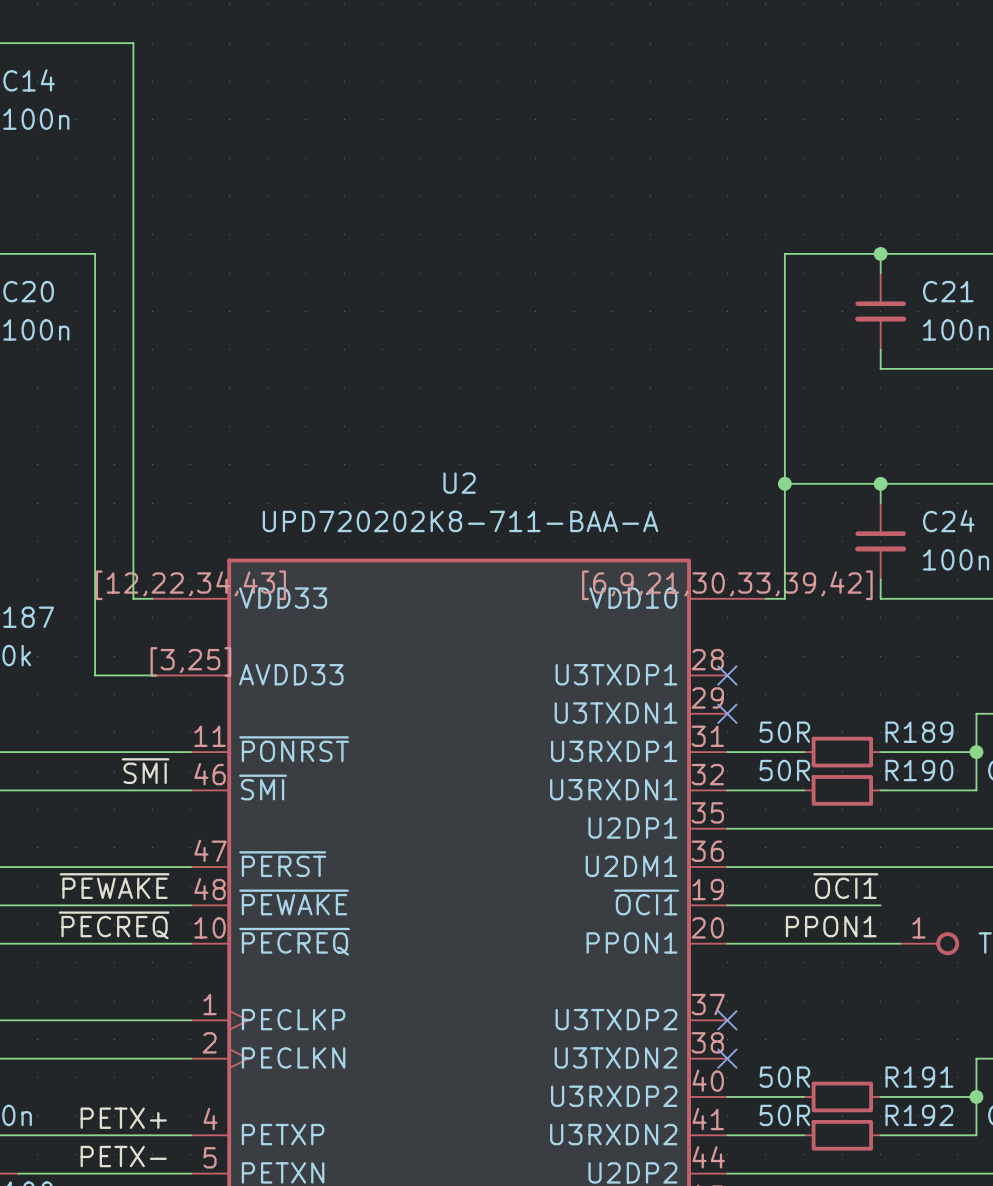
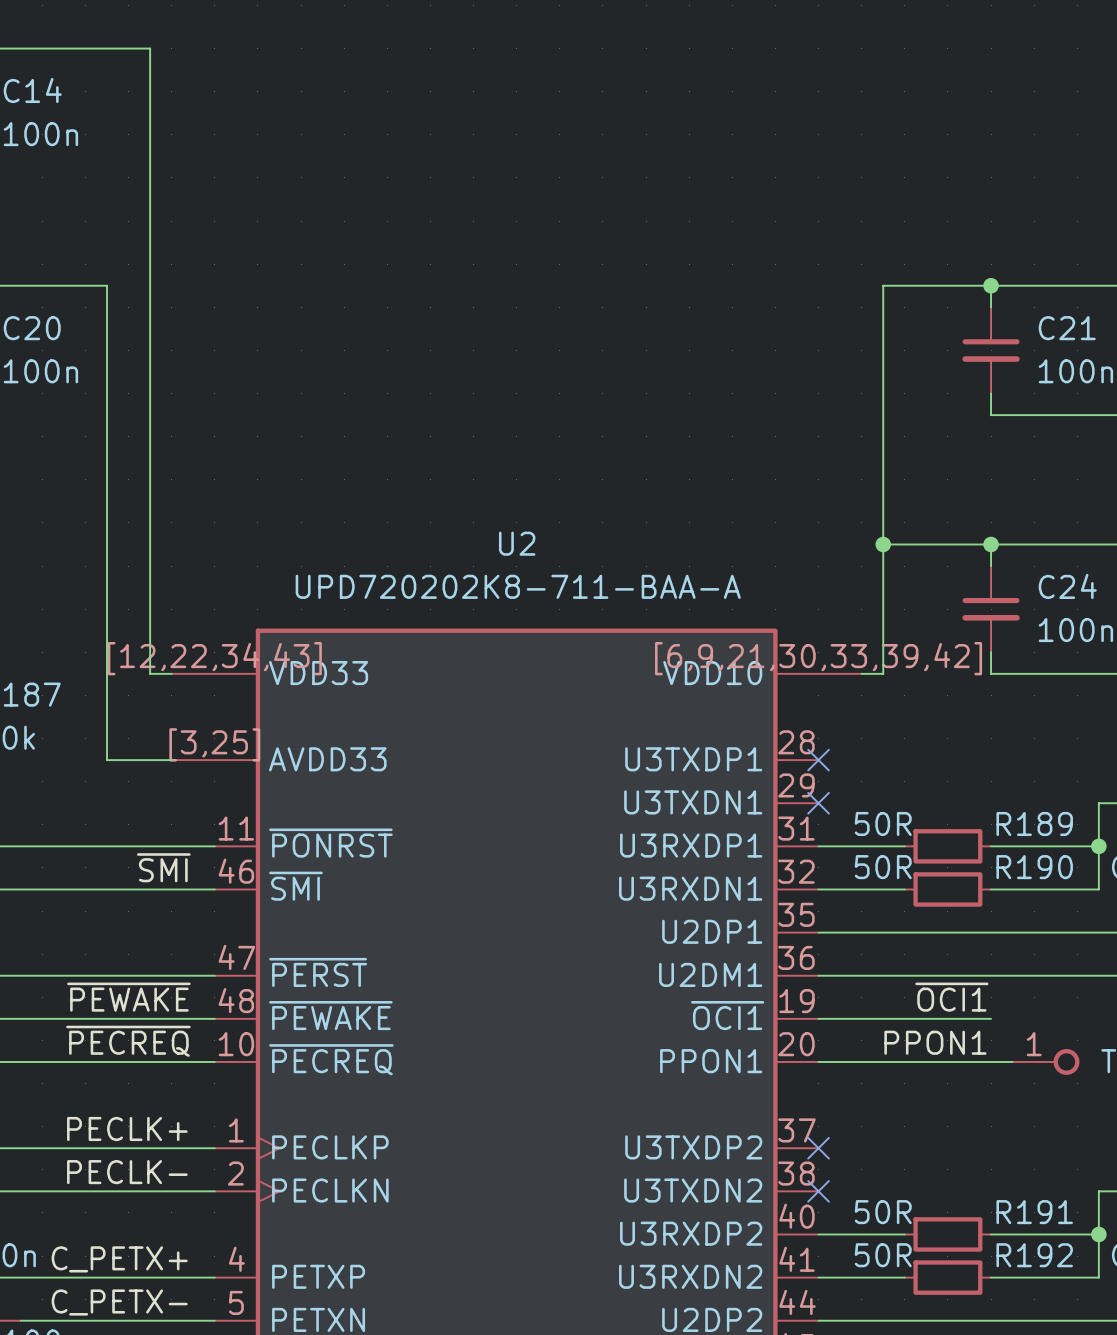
label: none -> PECLK+ (127, 1128)
label: none -> PECLK- (127, 1172)
label: PETX+ (123, 1118) -> C_PETX+ (119, 1259)
label: PETX- (123, 1156) -> C_PETX- (119, 1302)

